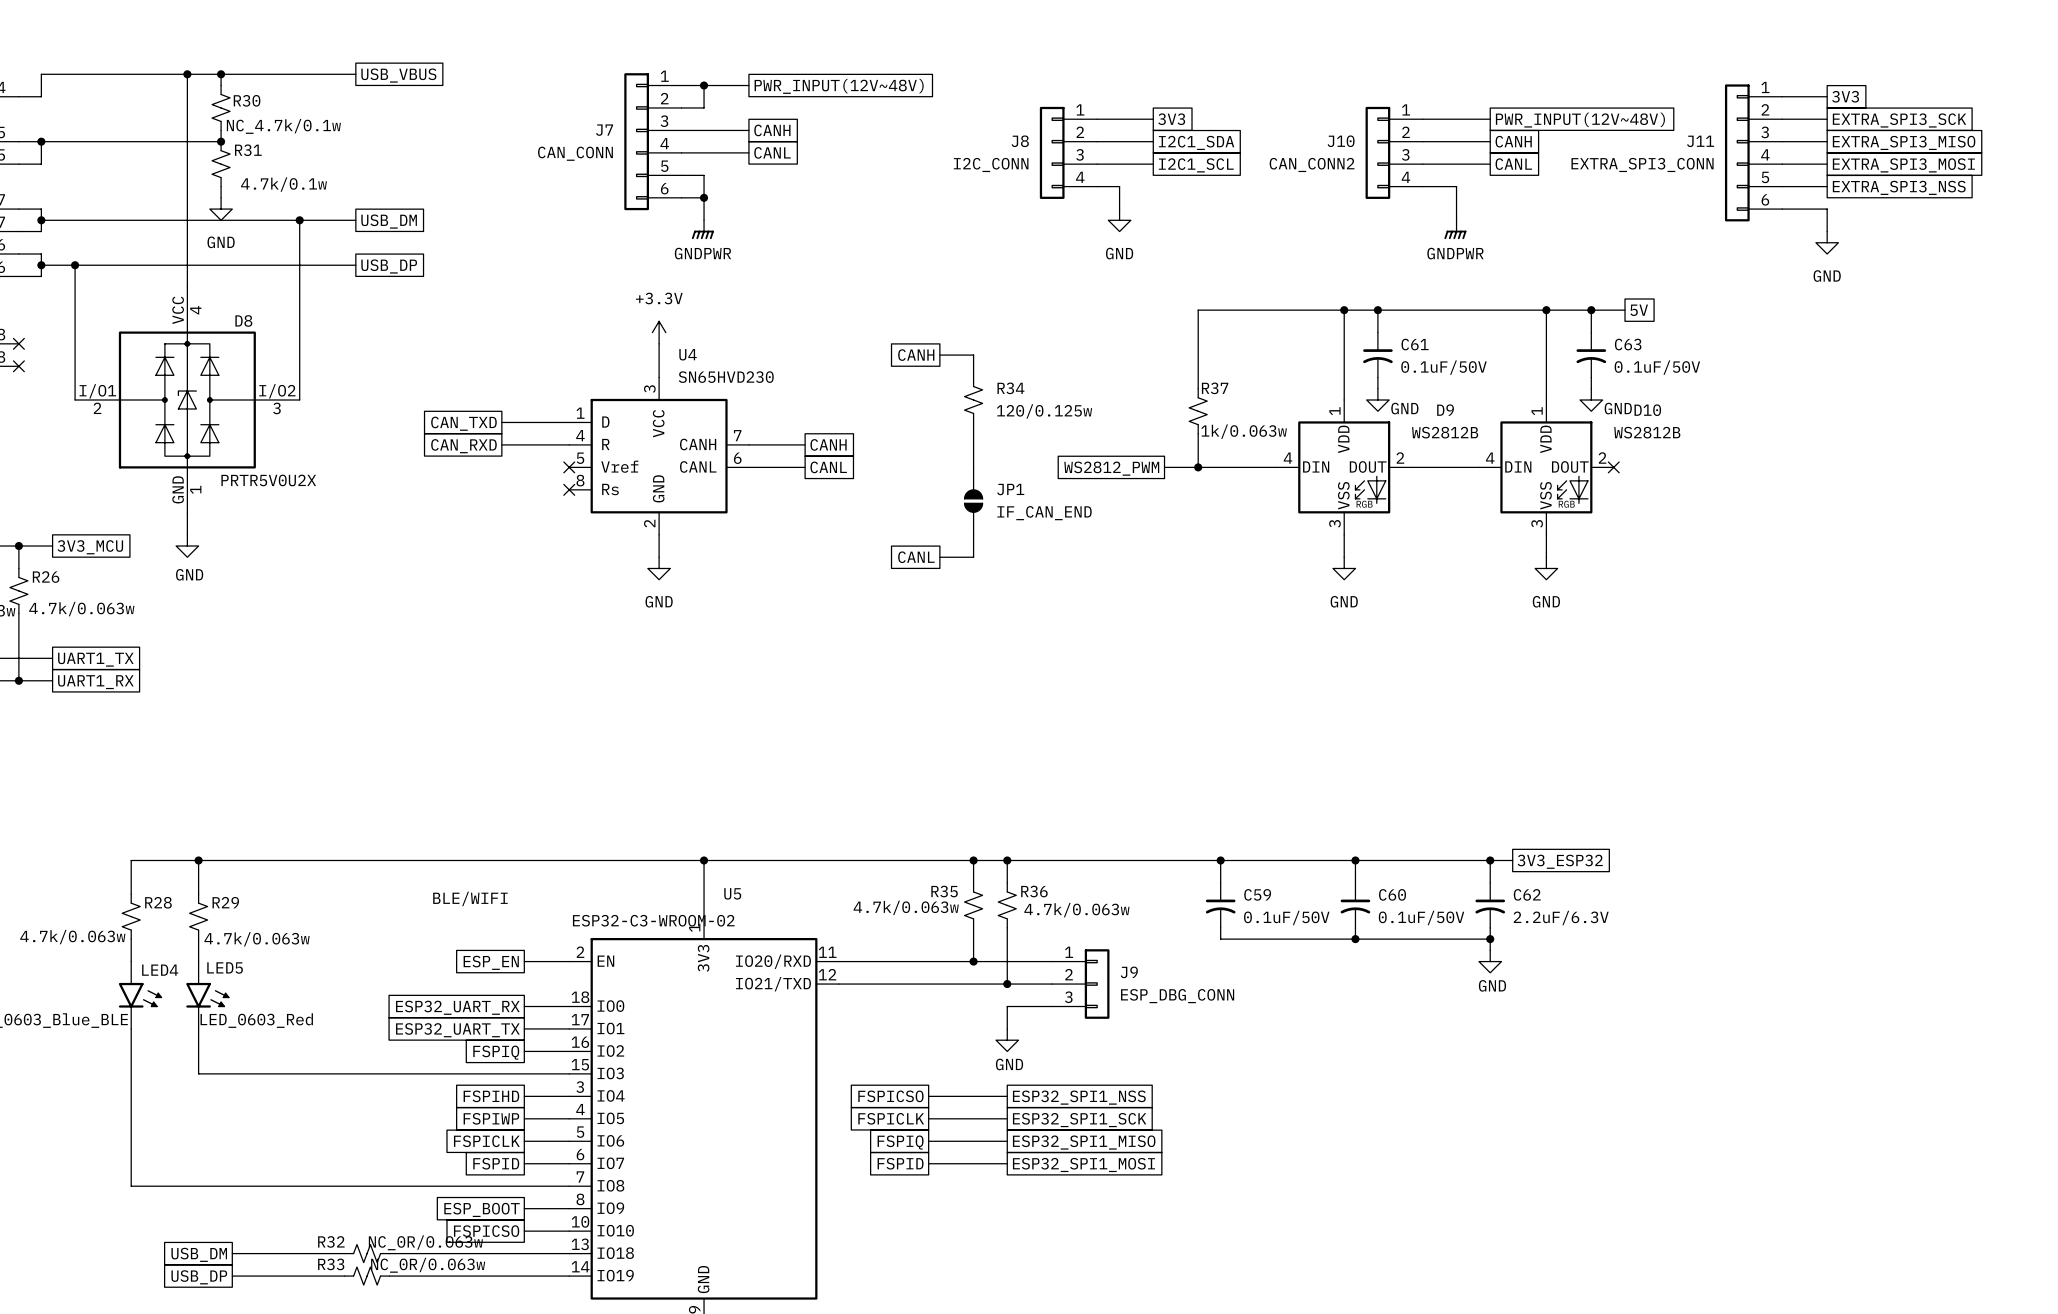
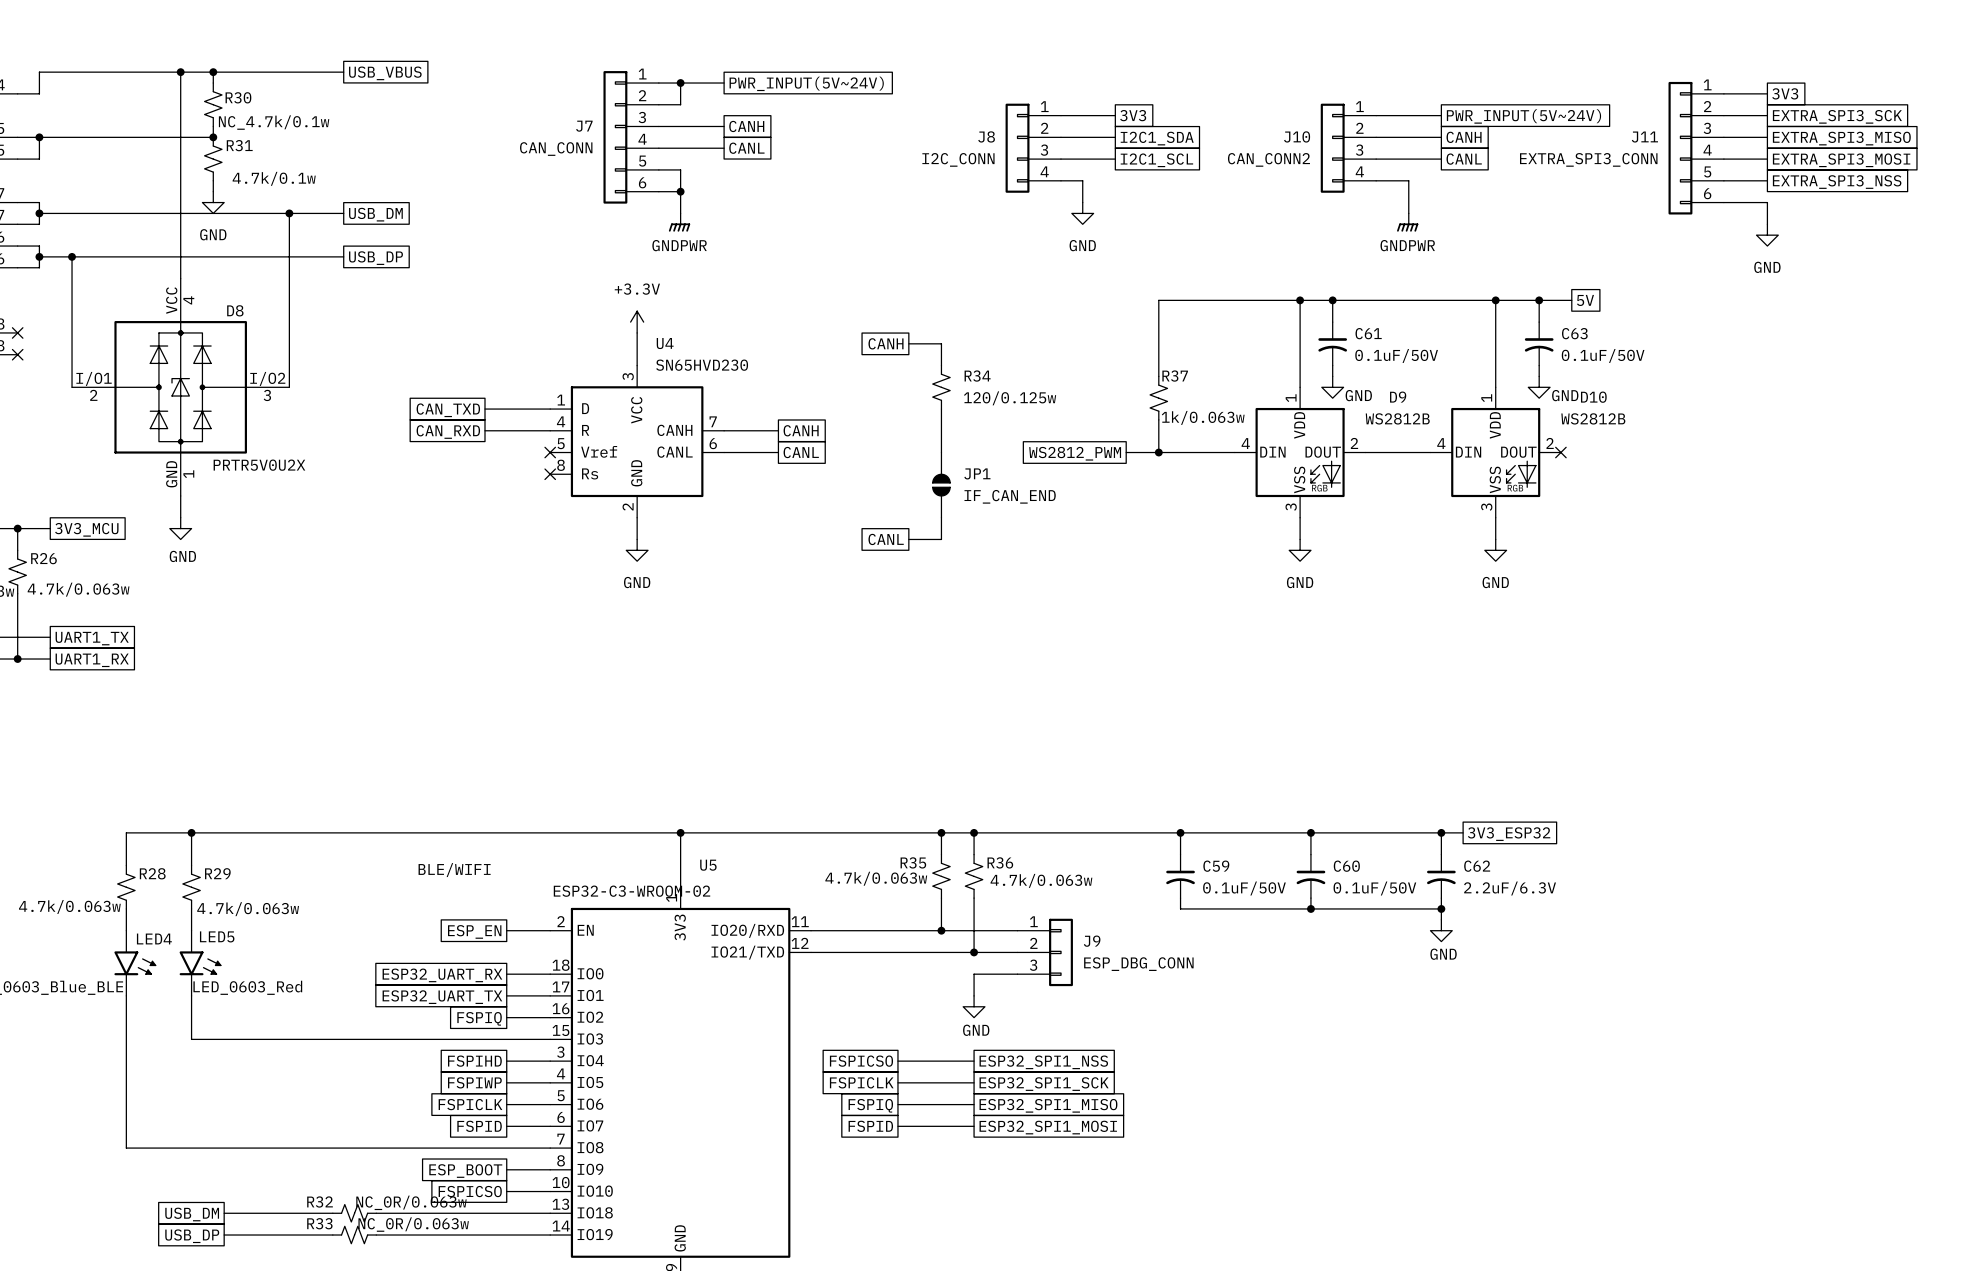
global label: PWR_INPUT(12V~48V) (839, 86) -> PWR_INPUT(5V~24V) (806, 83)
global label: PWR_INPUT(12V~48V) (1580, 120) -> PWR_INPUT(5V~24V) (1523, 116)

